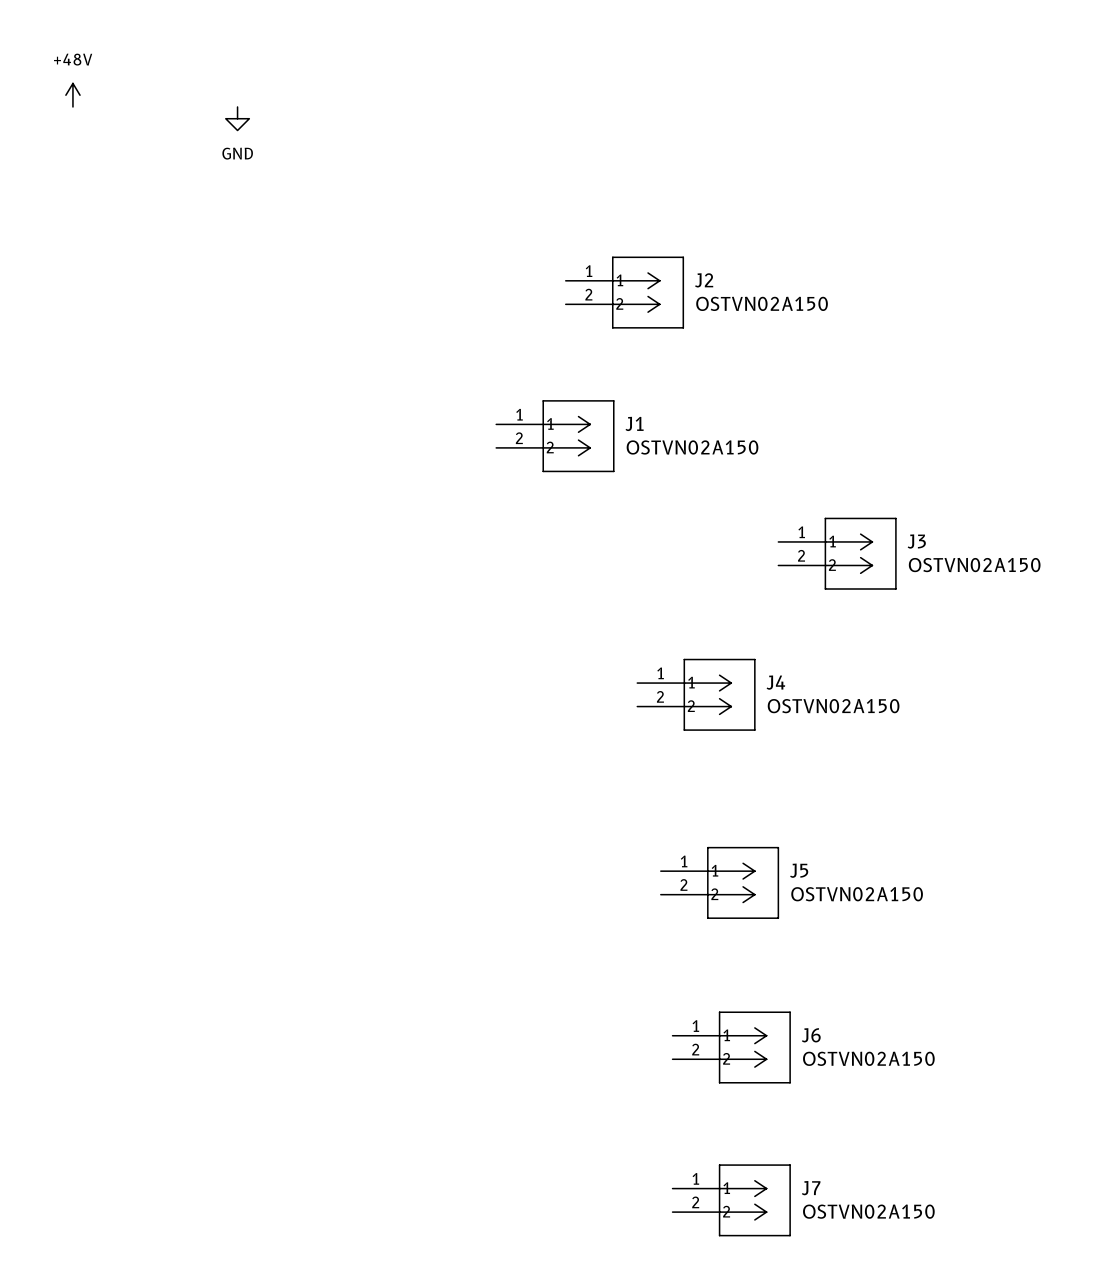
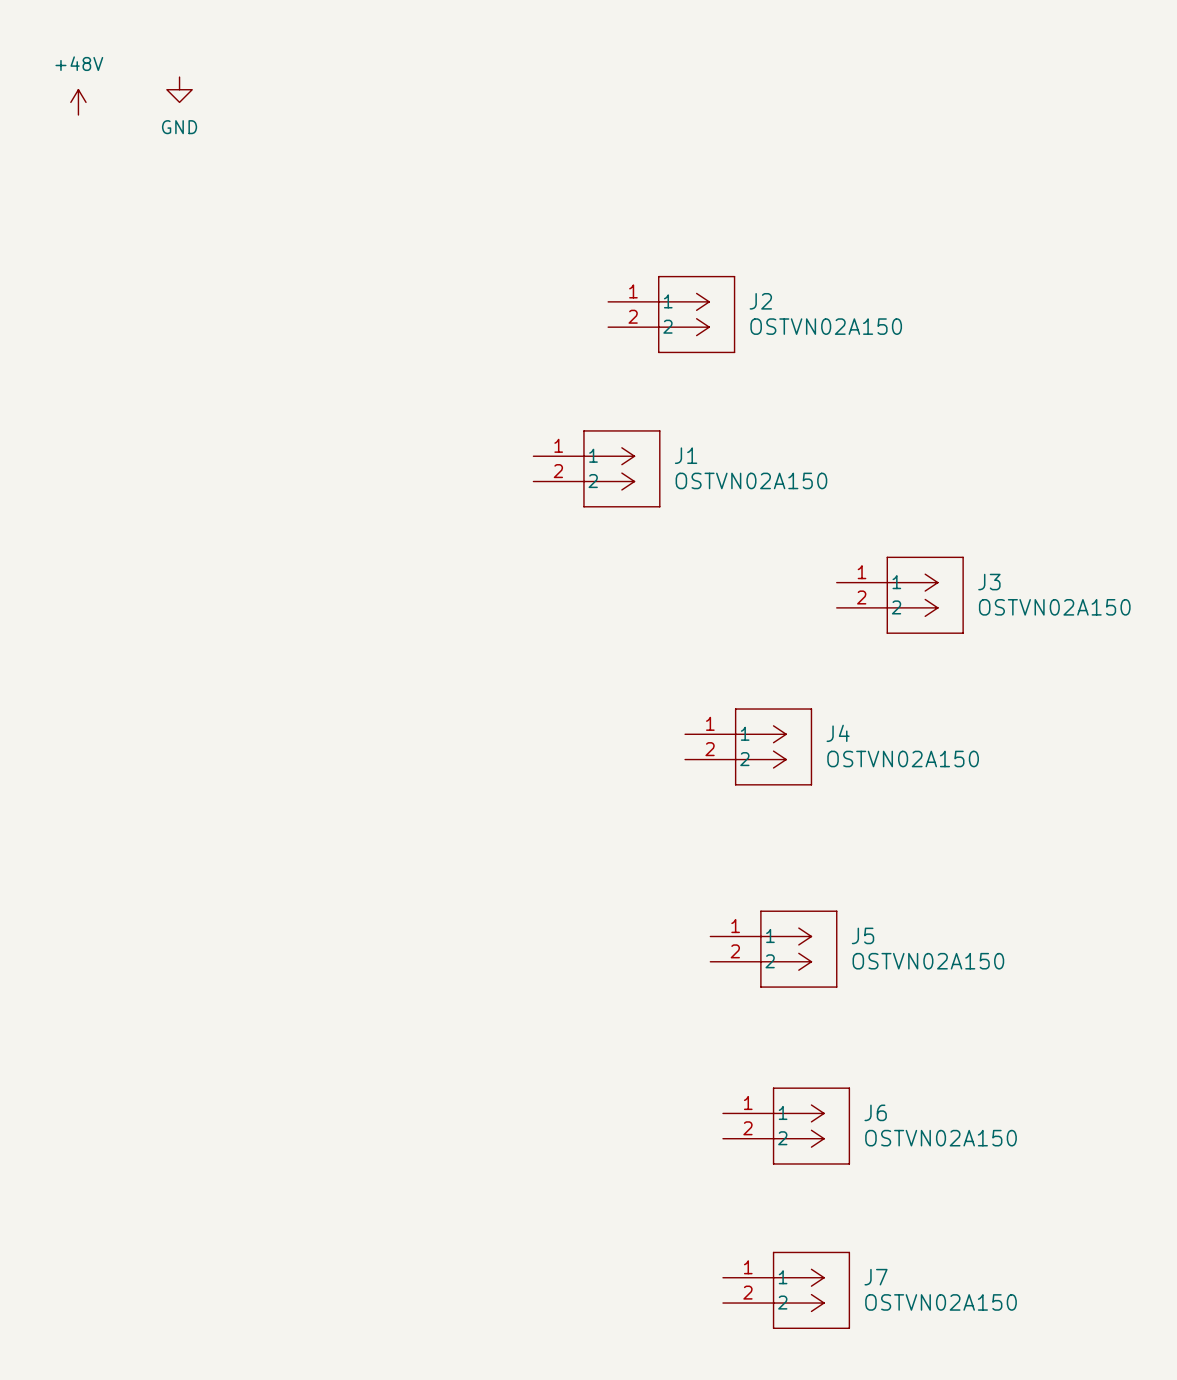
power symbol position: GND (237, 118) -> GND (179, 89)

